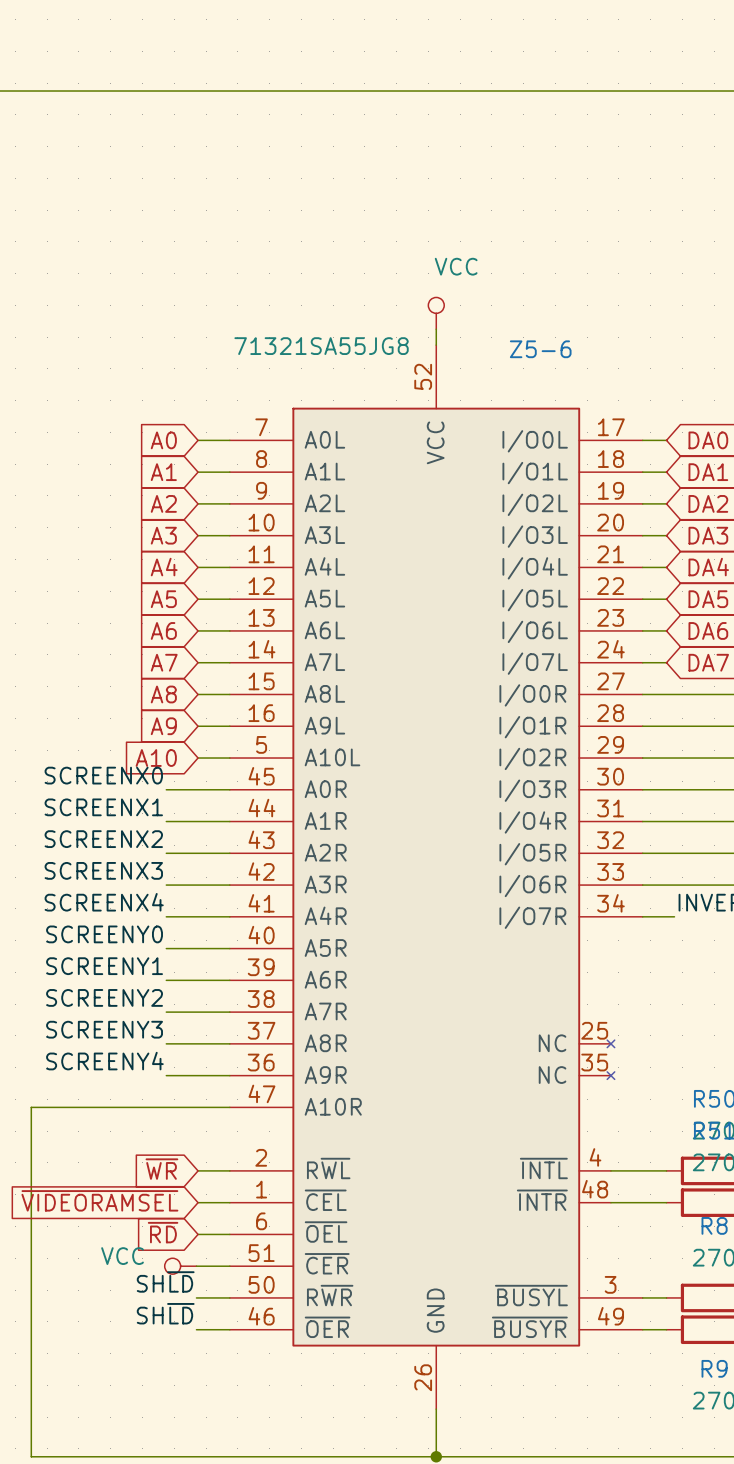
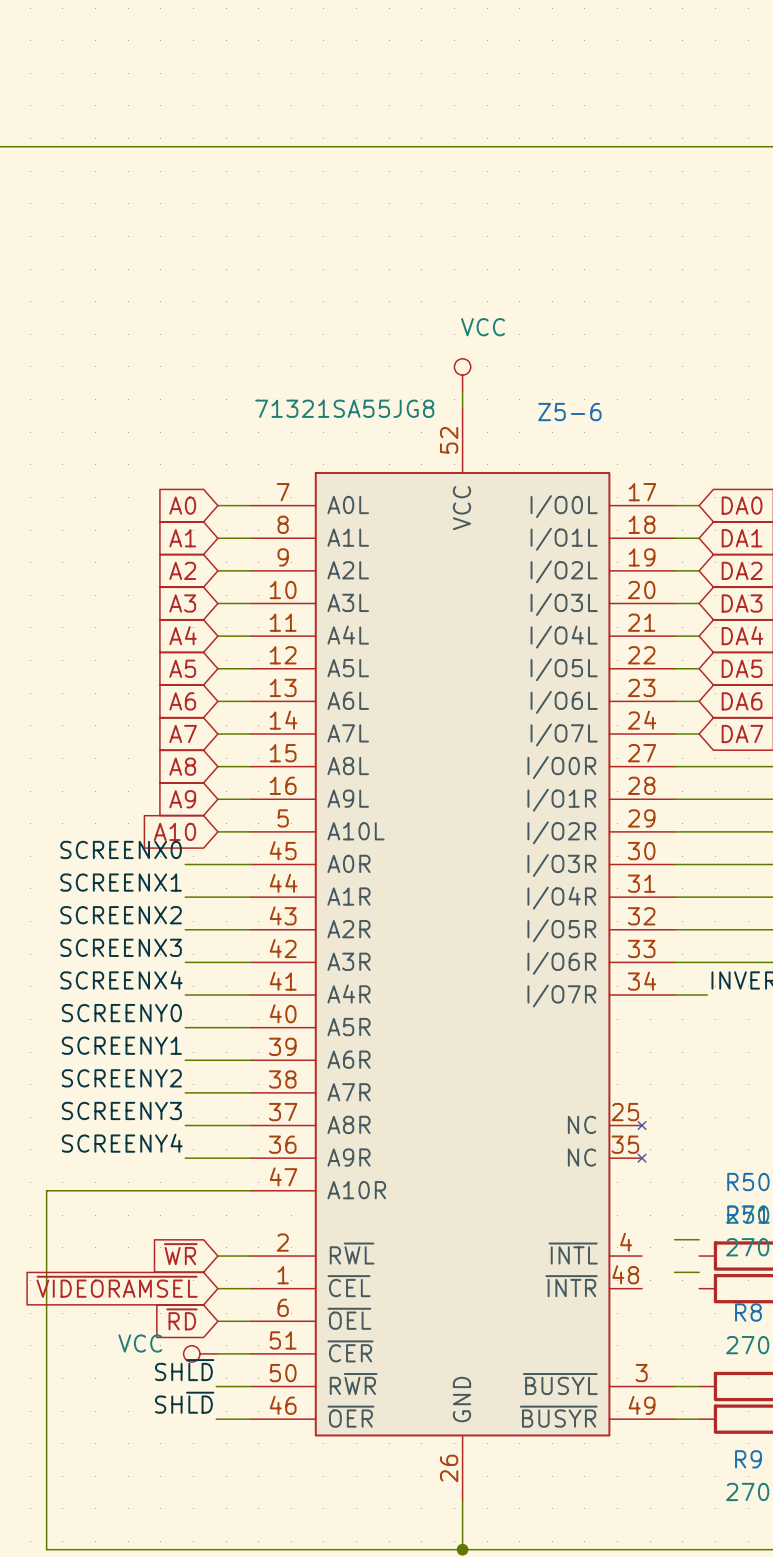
wire: none -> (674, 1239) (699, 1239)
wire: (610, 1170) (666, 1170) -> none
wire: none -> (674, 1272) (699, 1272)
wire: (610, 1202) (666, 1202) -> none

